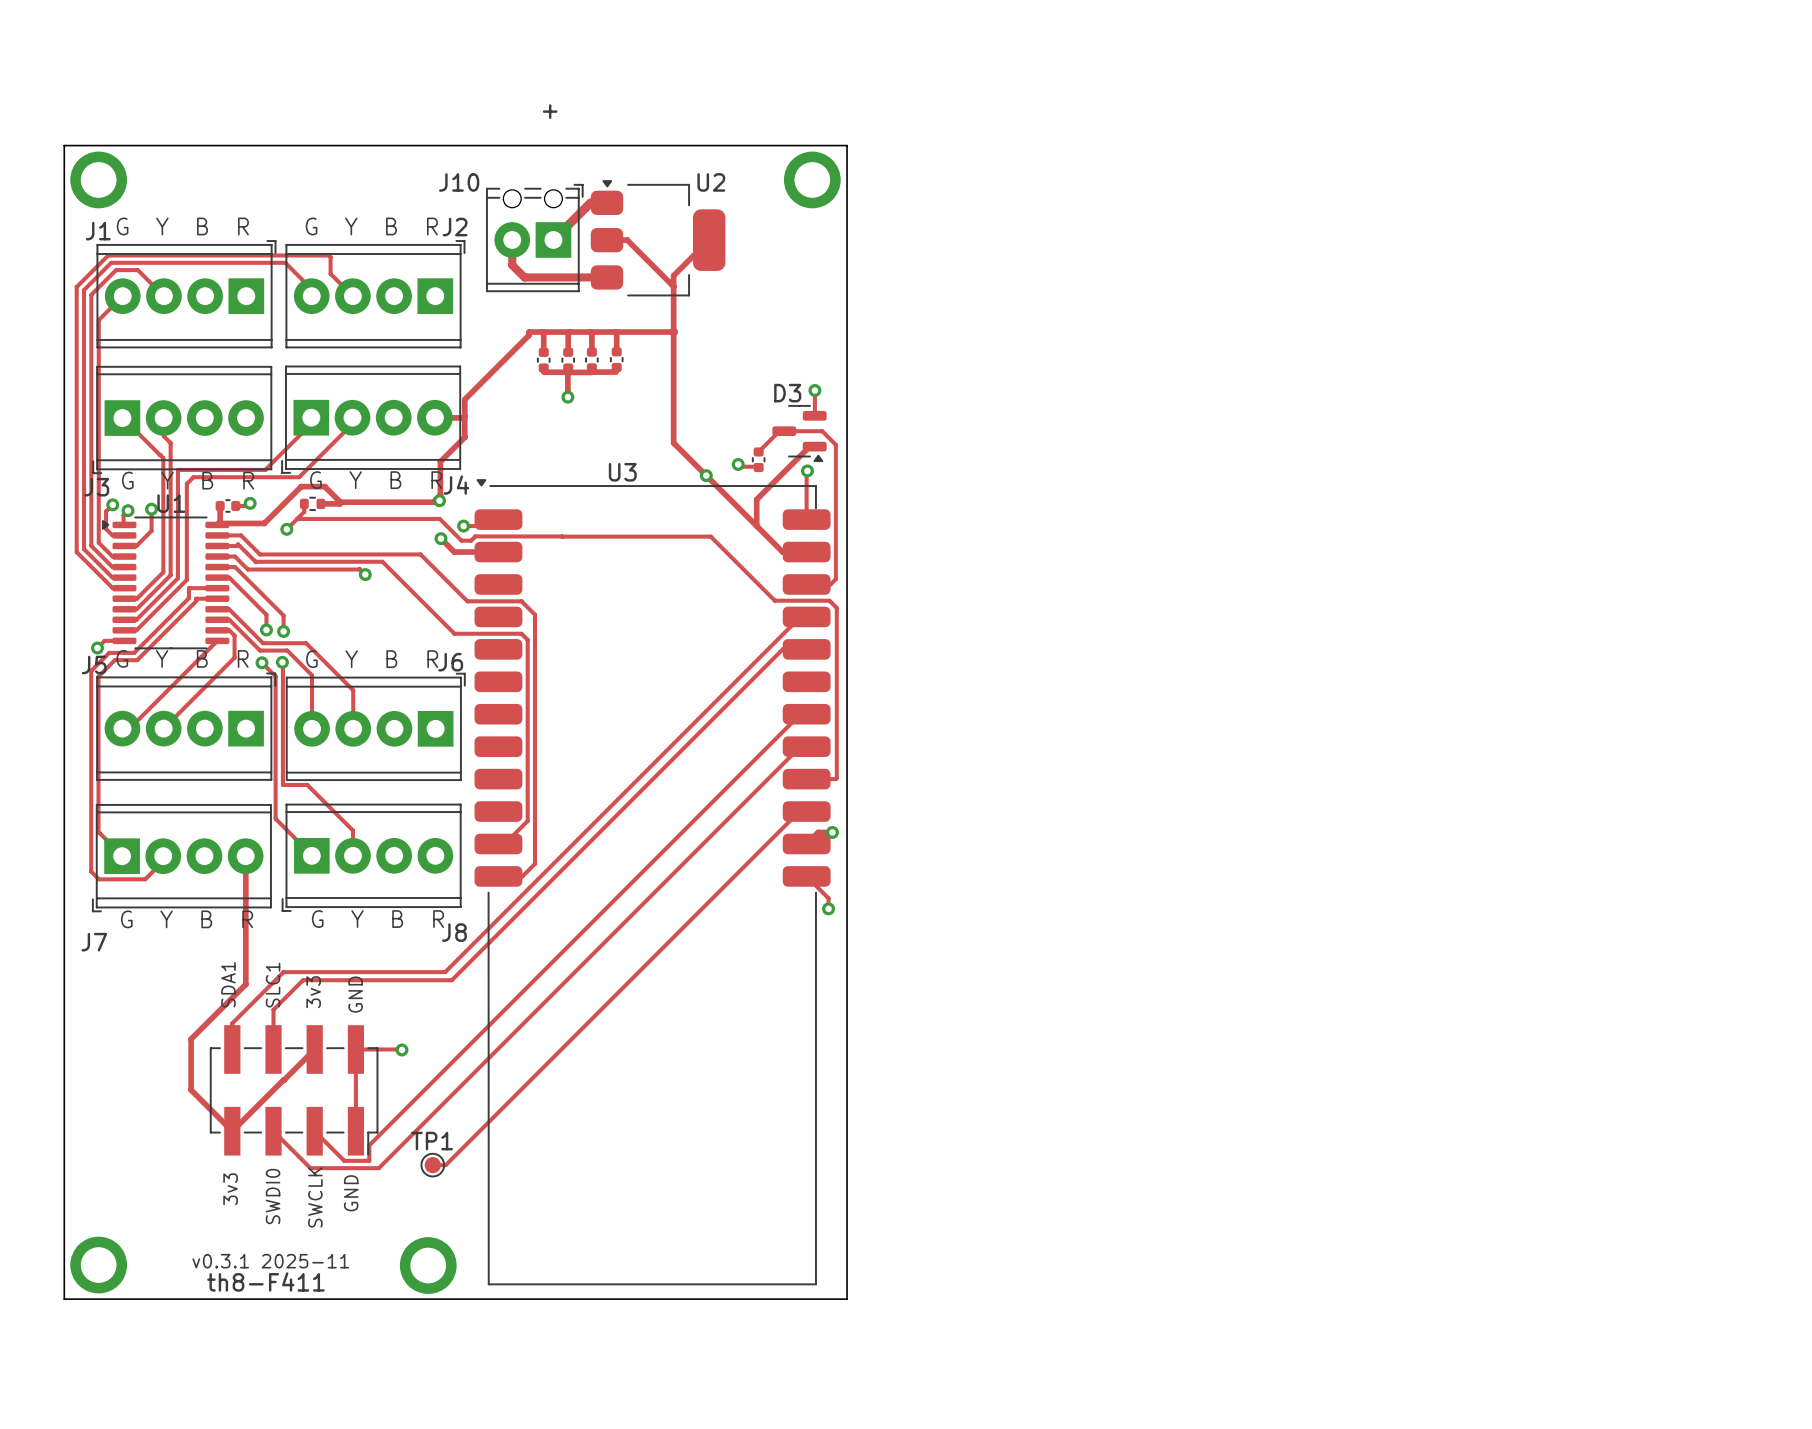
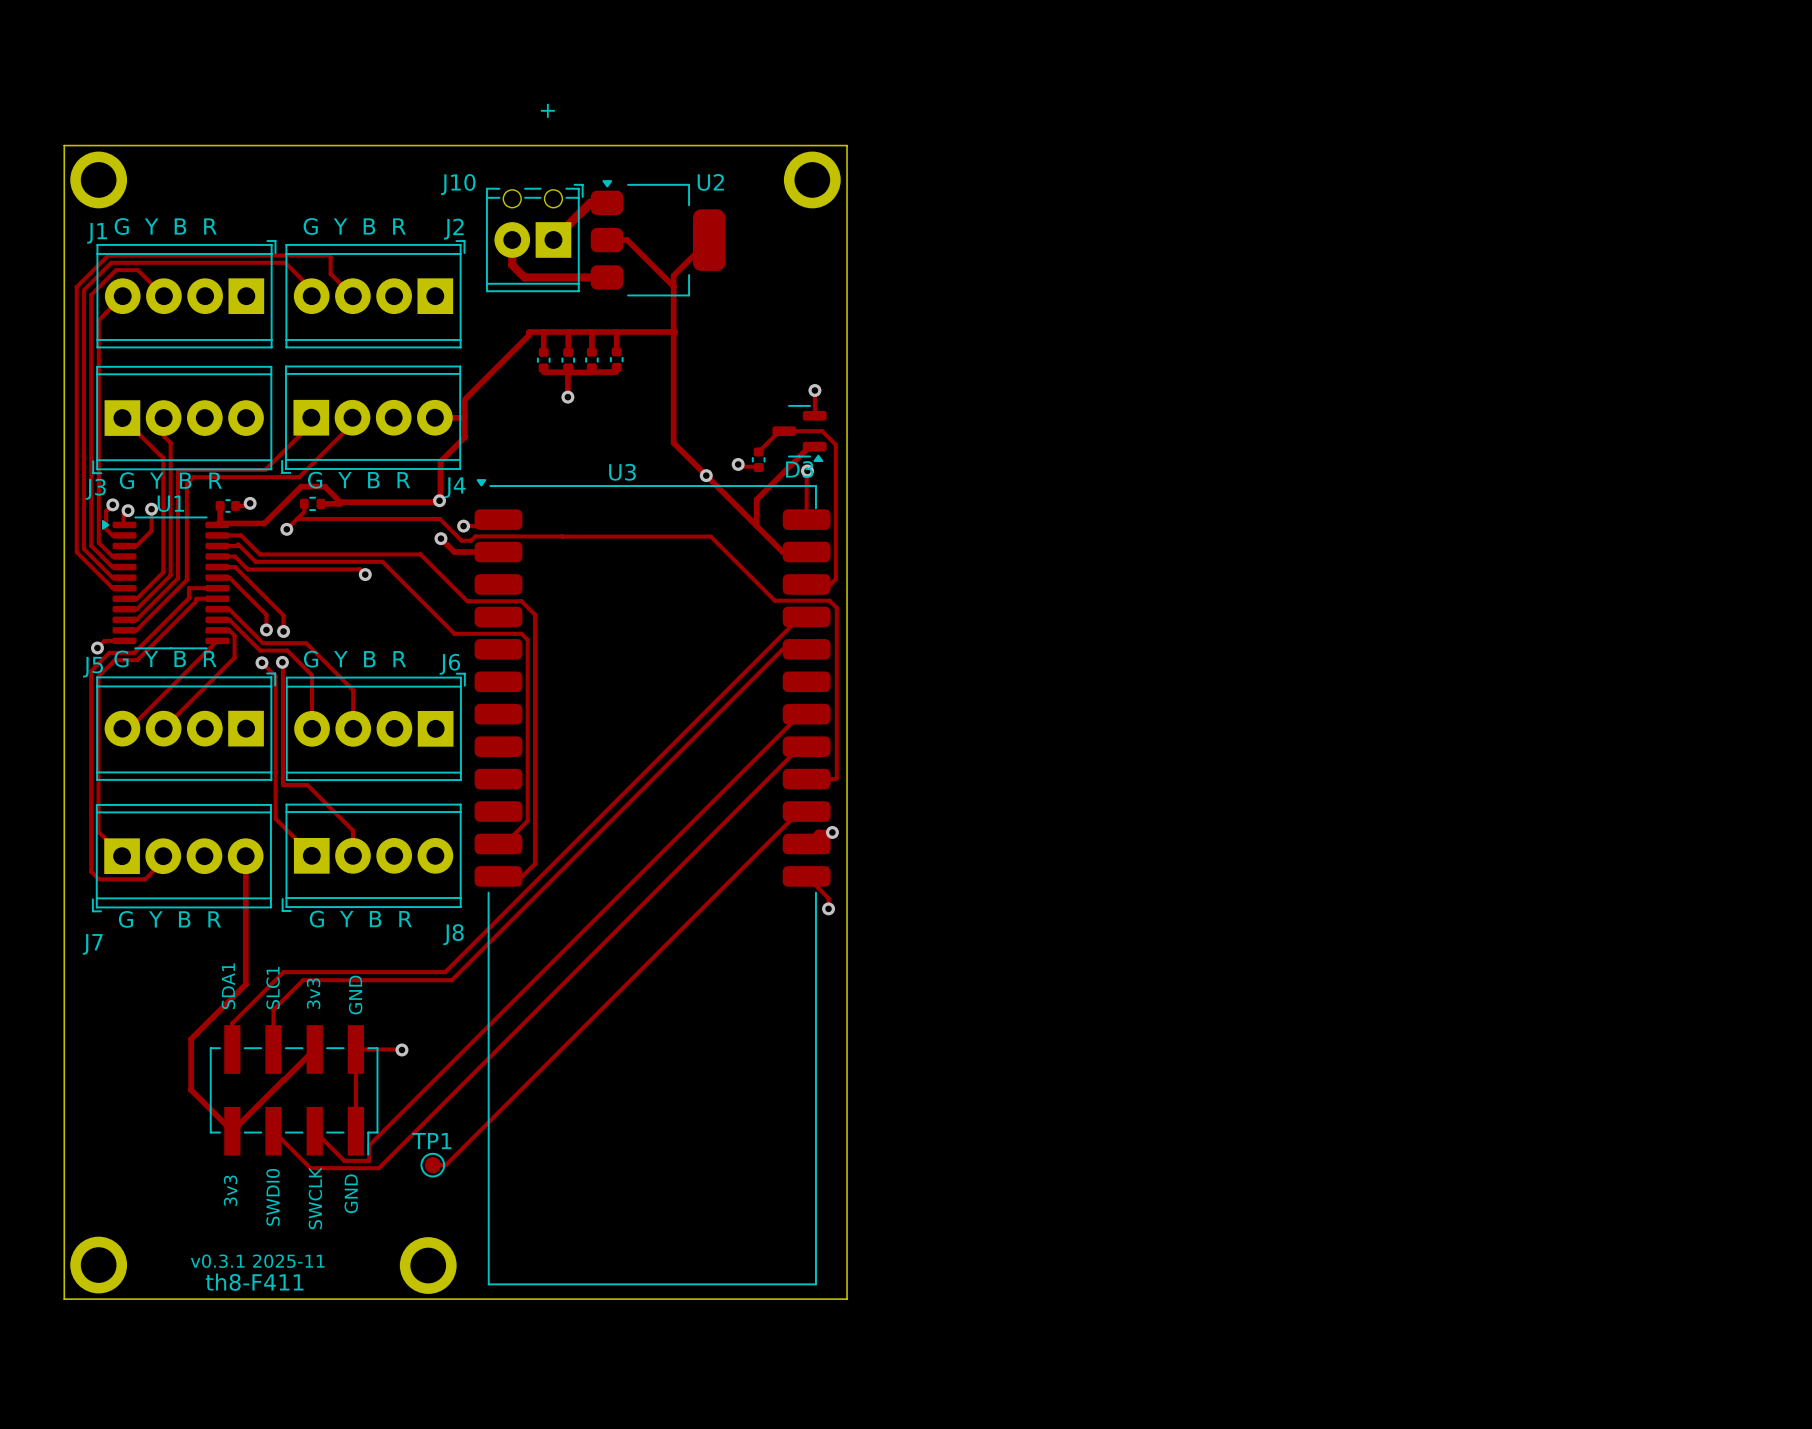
D3 name position: D3 (787, 393) -> D3 (799, 469)

